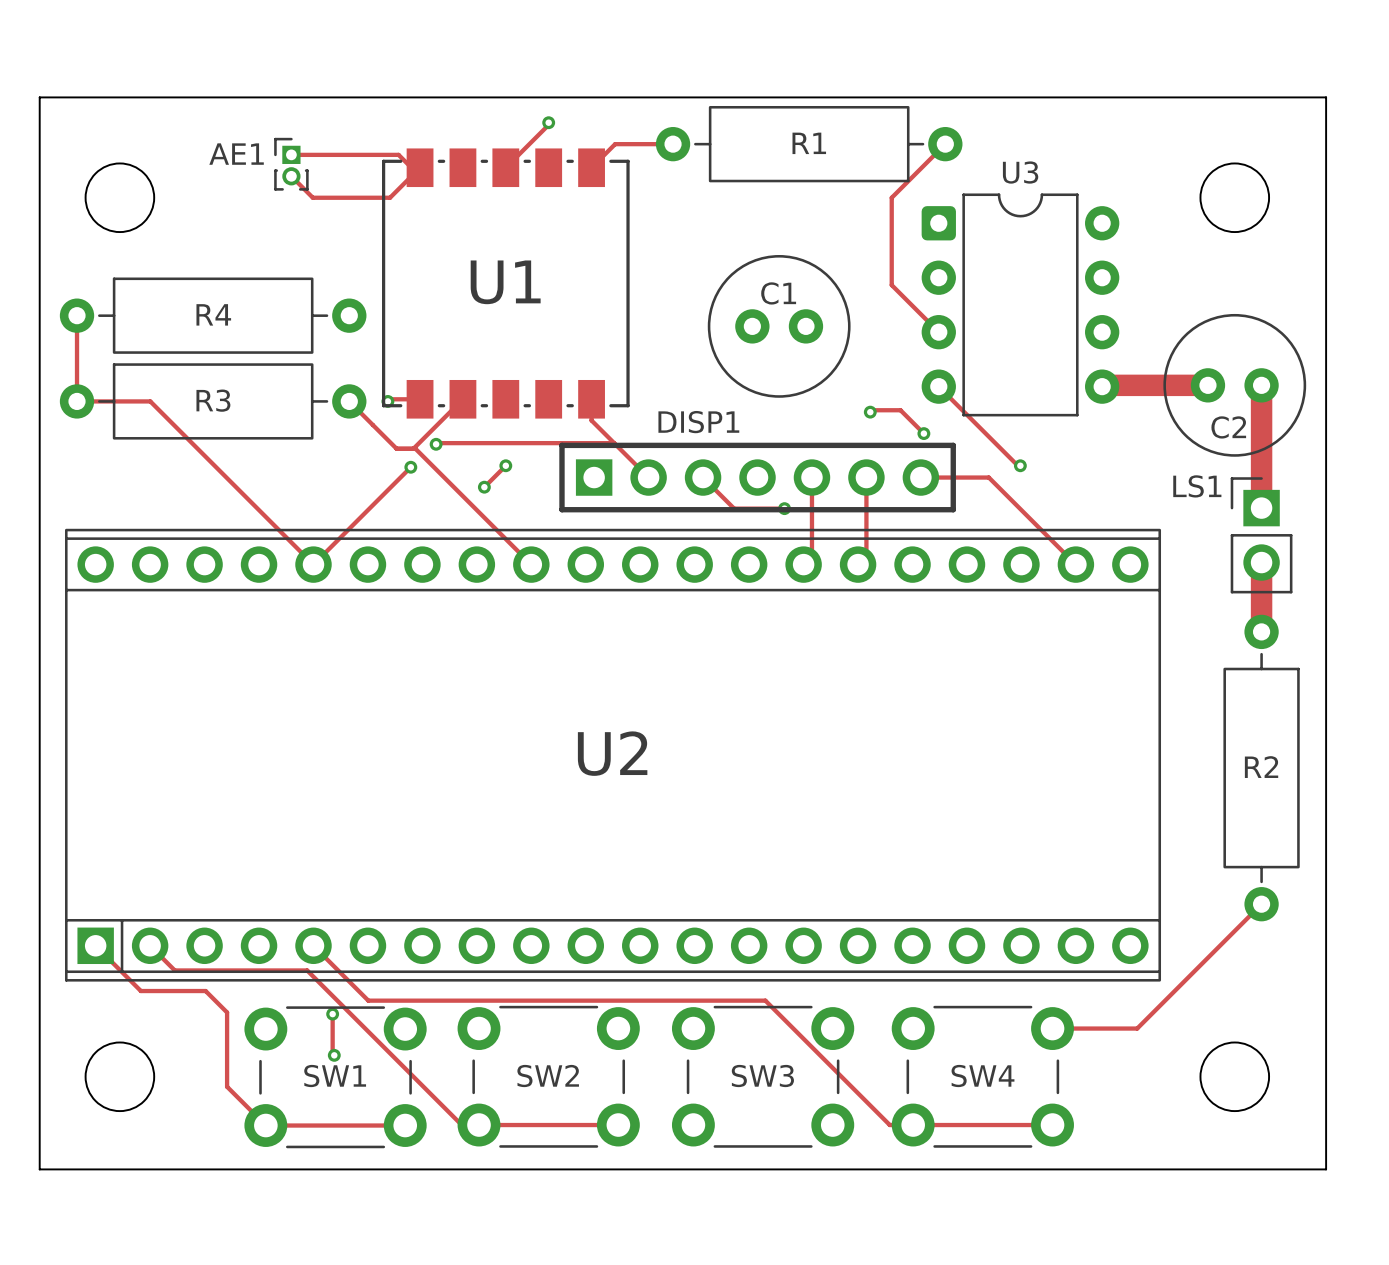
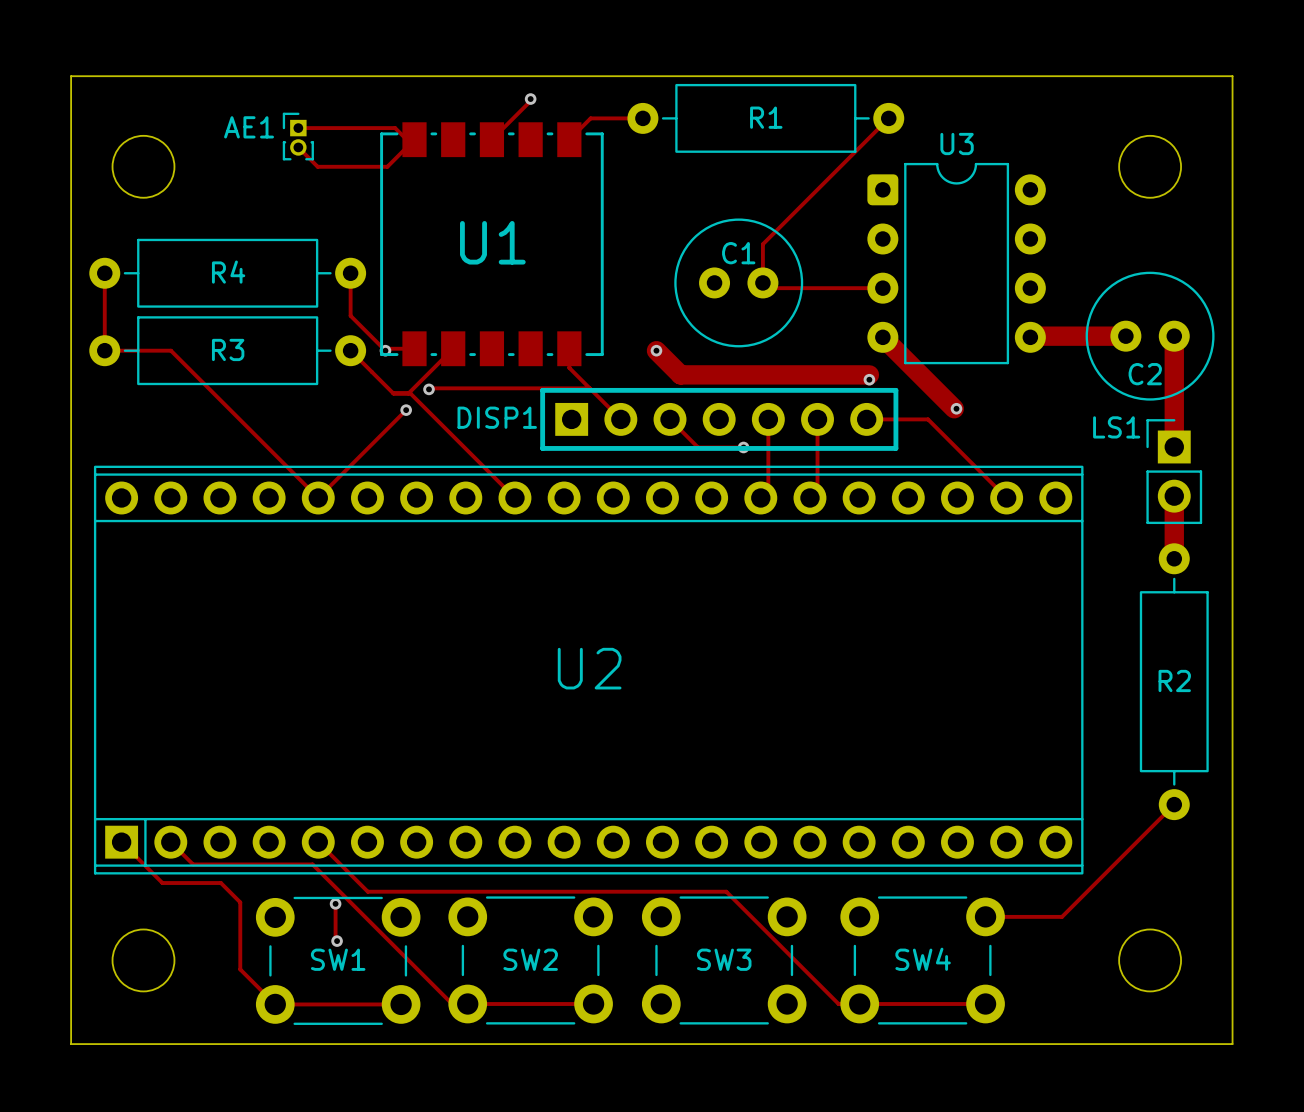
track: (891, 197) (891, 285) (933, 326) -> (840, 166) (762, 244) (762, 287) (882, 288)
track: none -> (350, 273) (350, 315) (385, 350)
track width: thin (938, 386) (1017, 465) -> thick (882, 337) (954, 408)
track: none -> (656, 350) (680, 374) (869, 374)
via: none -> (656, 350)
track: (870, 412) (872, 410) (900, 410) (923, 433) -> none
via: (870, 412) -> none
DISP1 name position: DISP1 (698, 422) -> DISP1 (497, 417)
track: (505, 465) (484, 487) -> none
via: (505, 465) -> none
via: (484, 487) -> none

